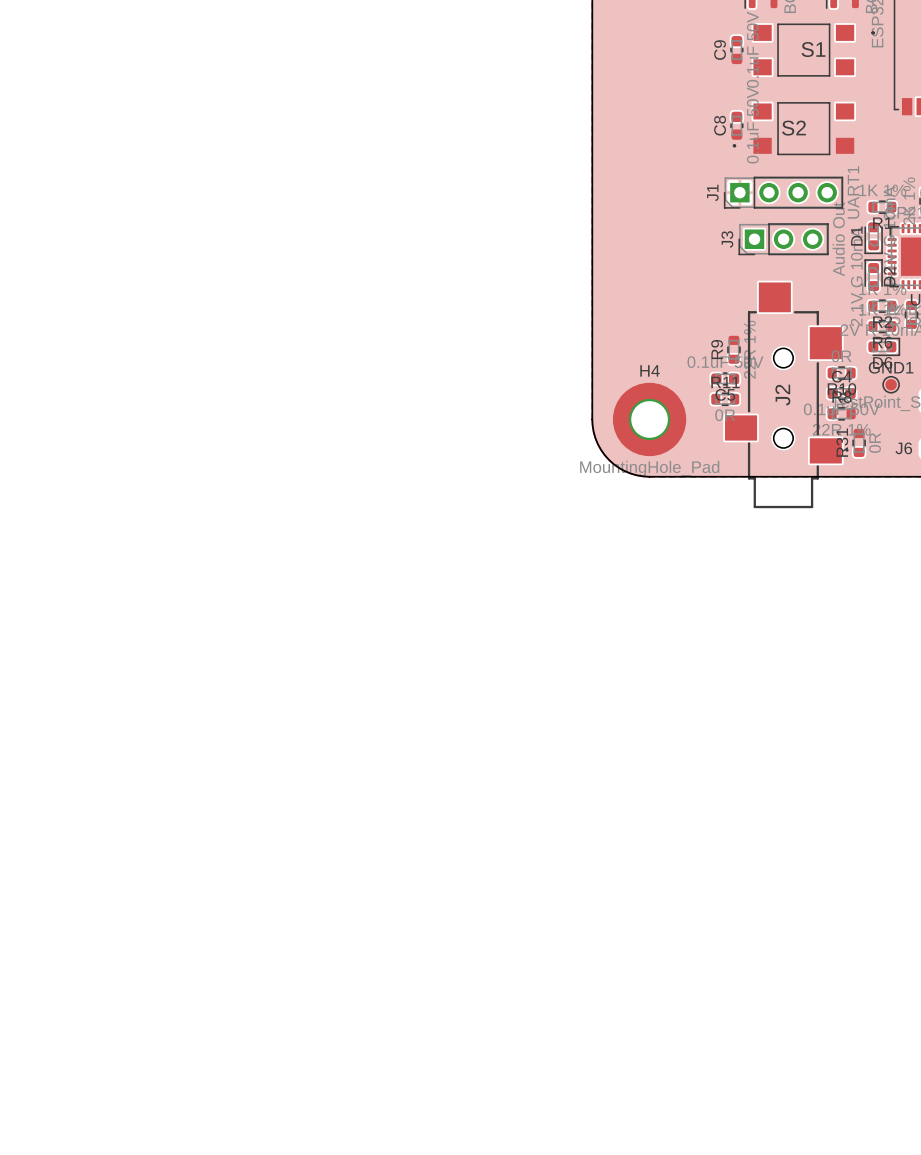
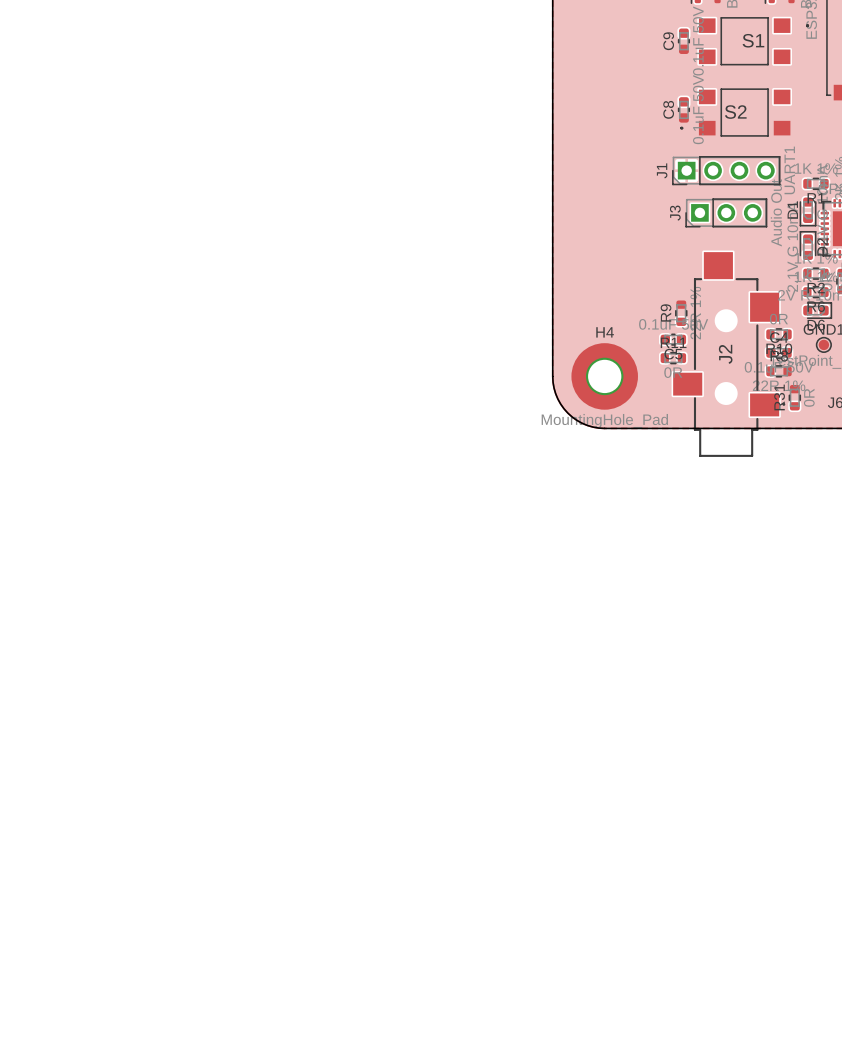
J2 footprint: [725, 282, 849, 509] -> [673, 252, 785, 457]

